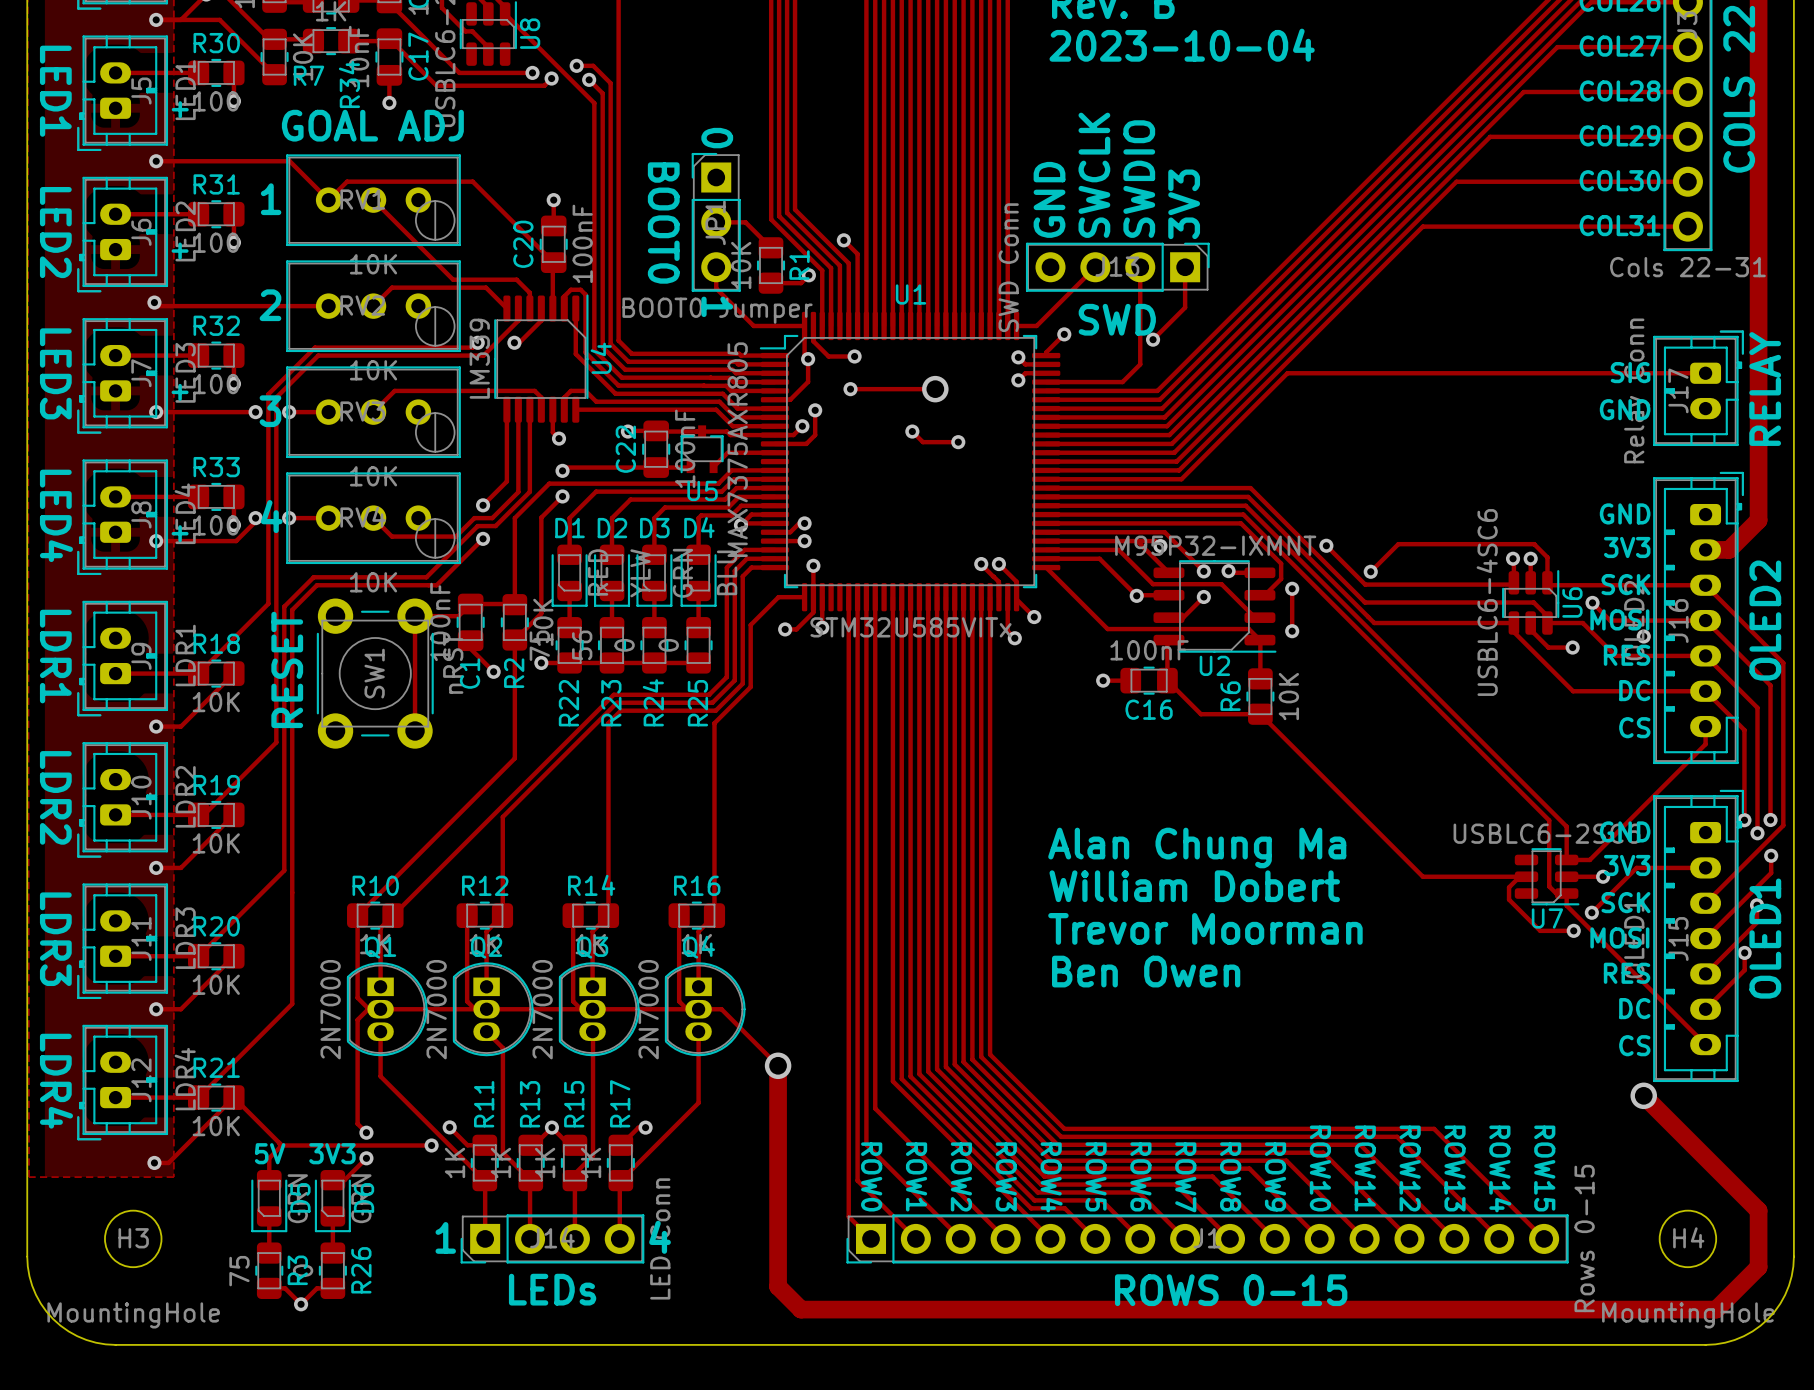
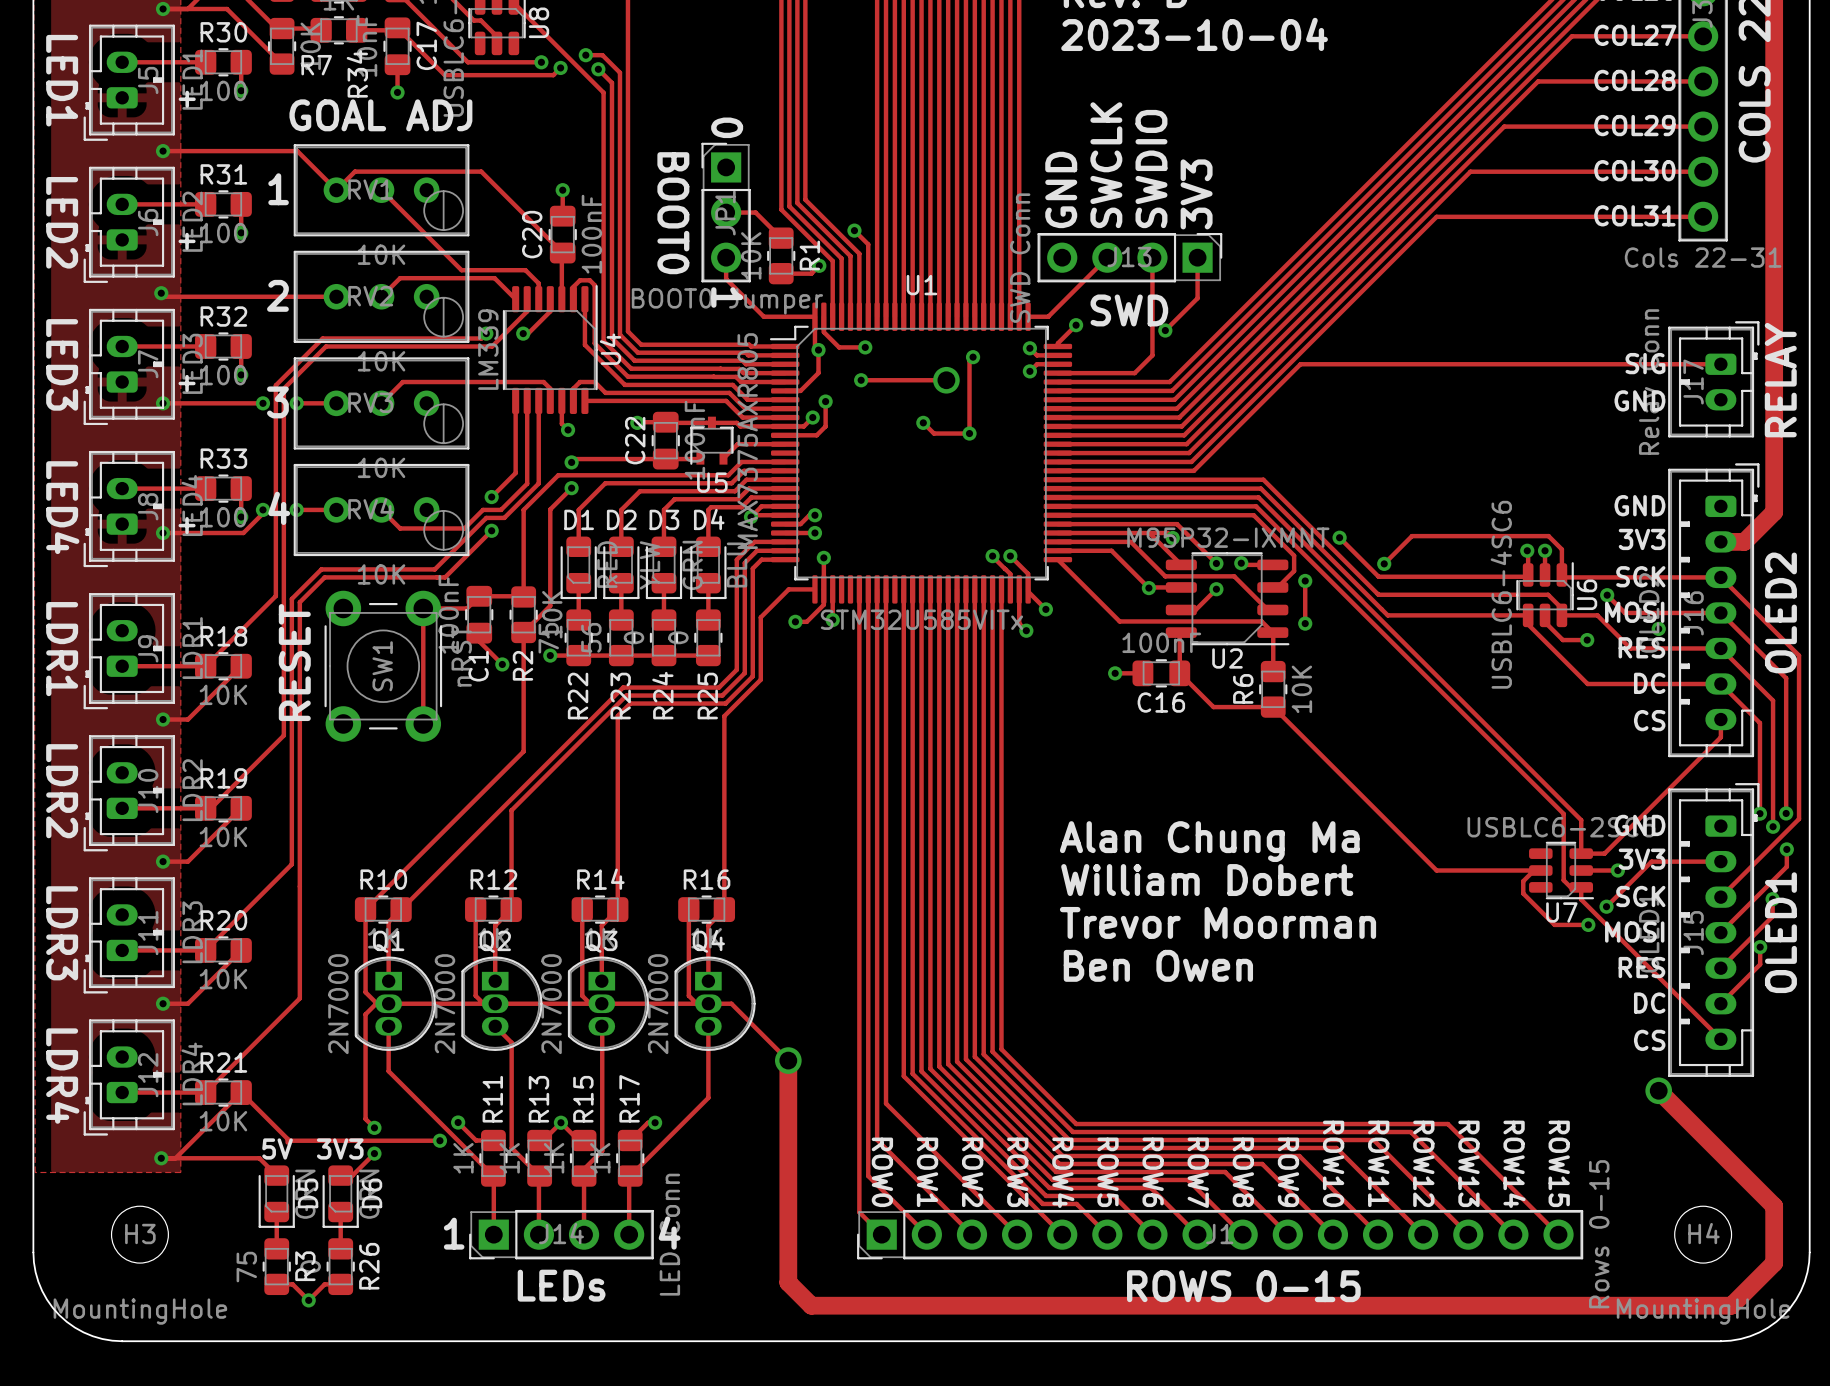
track: none -> (973, 357) (969, 360) (969, 433)
via: none -> (973, 357)
track: (281, 1145) (269, 1158) (269, 1180) -> (175, 1158) (259, 1158) (276, 1175)

